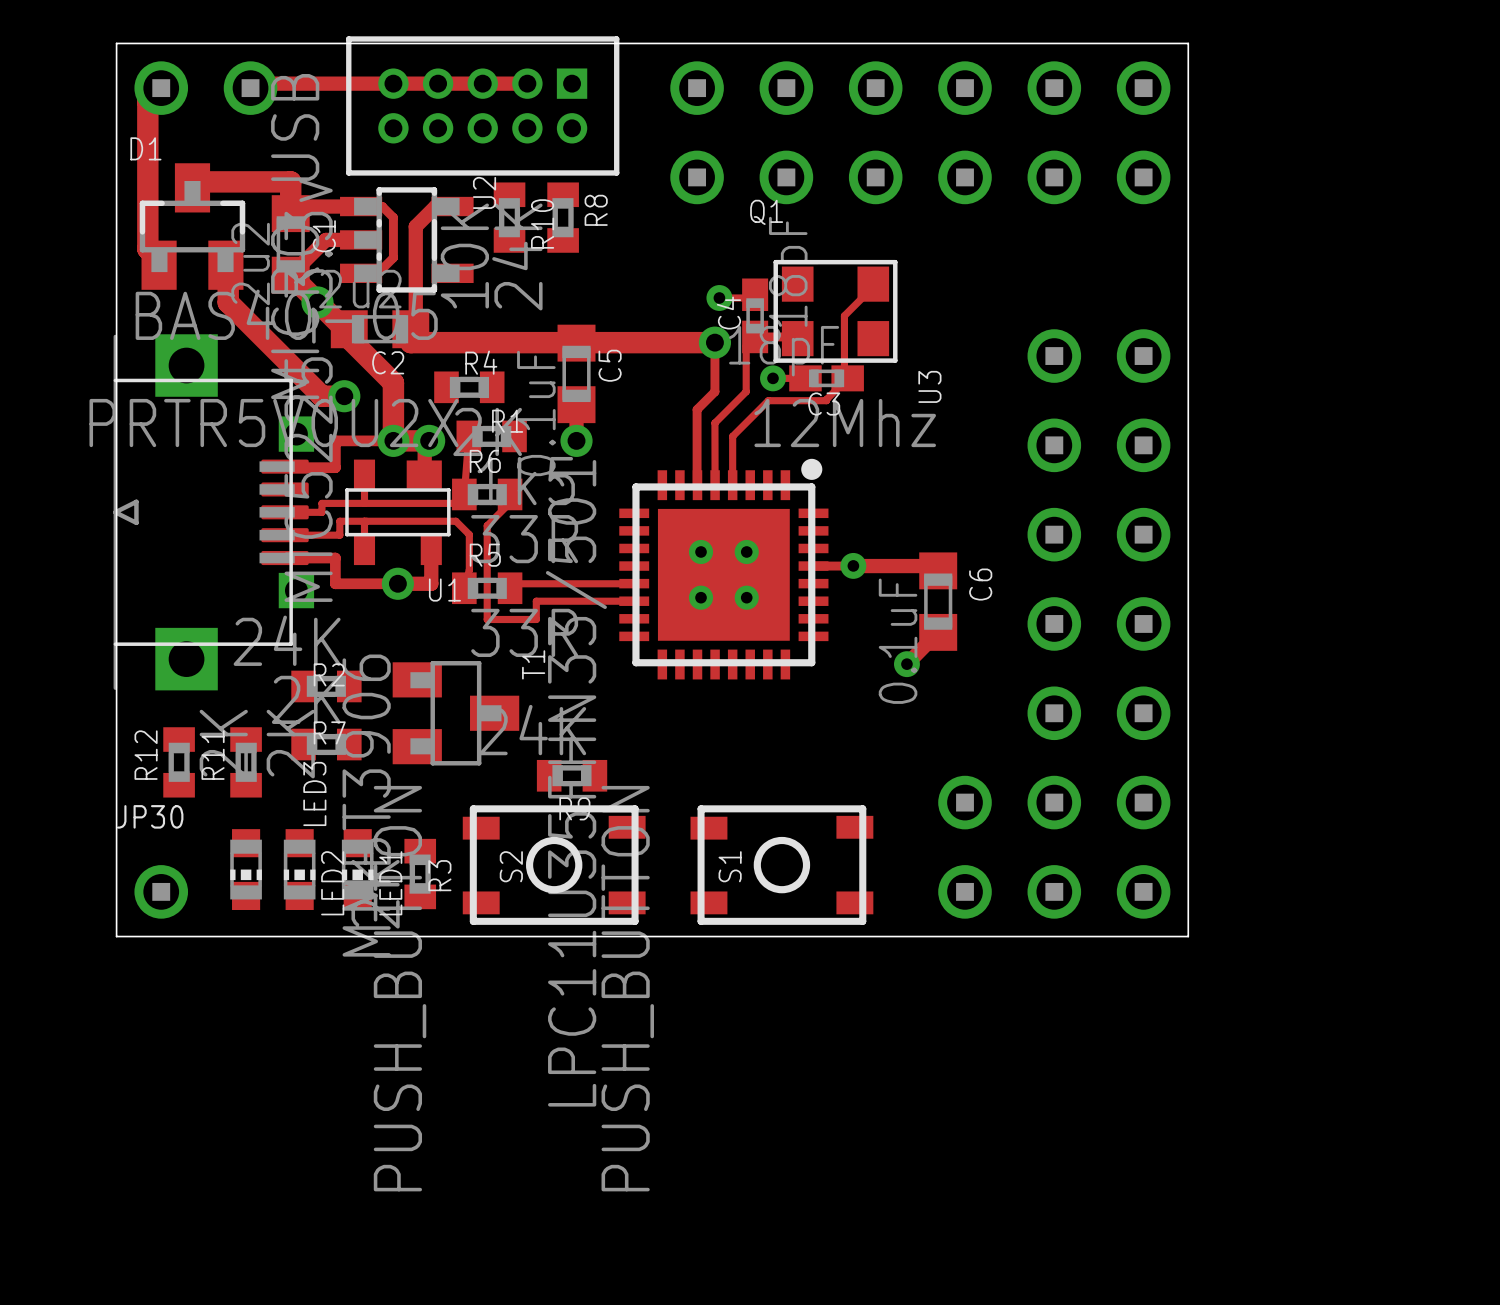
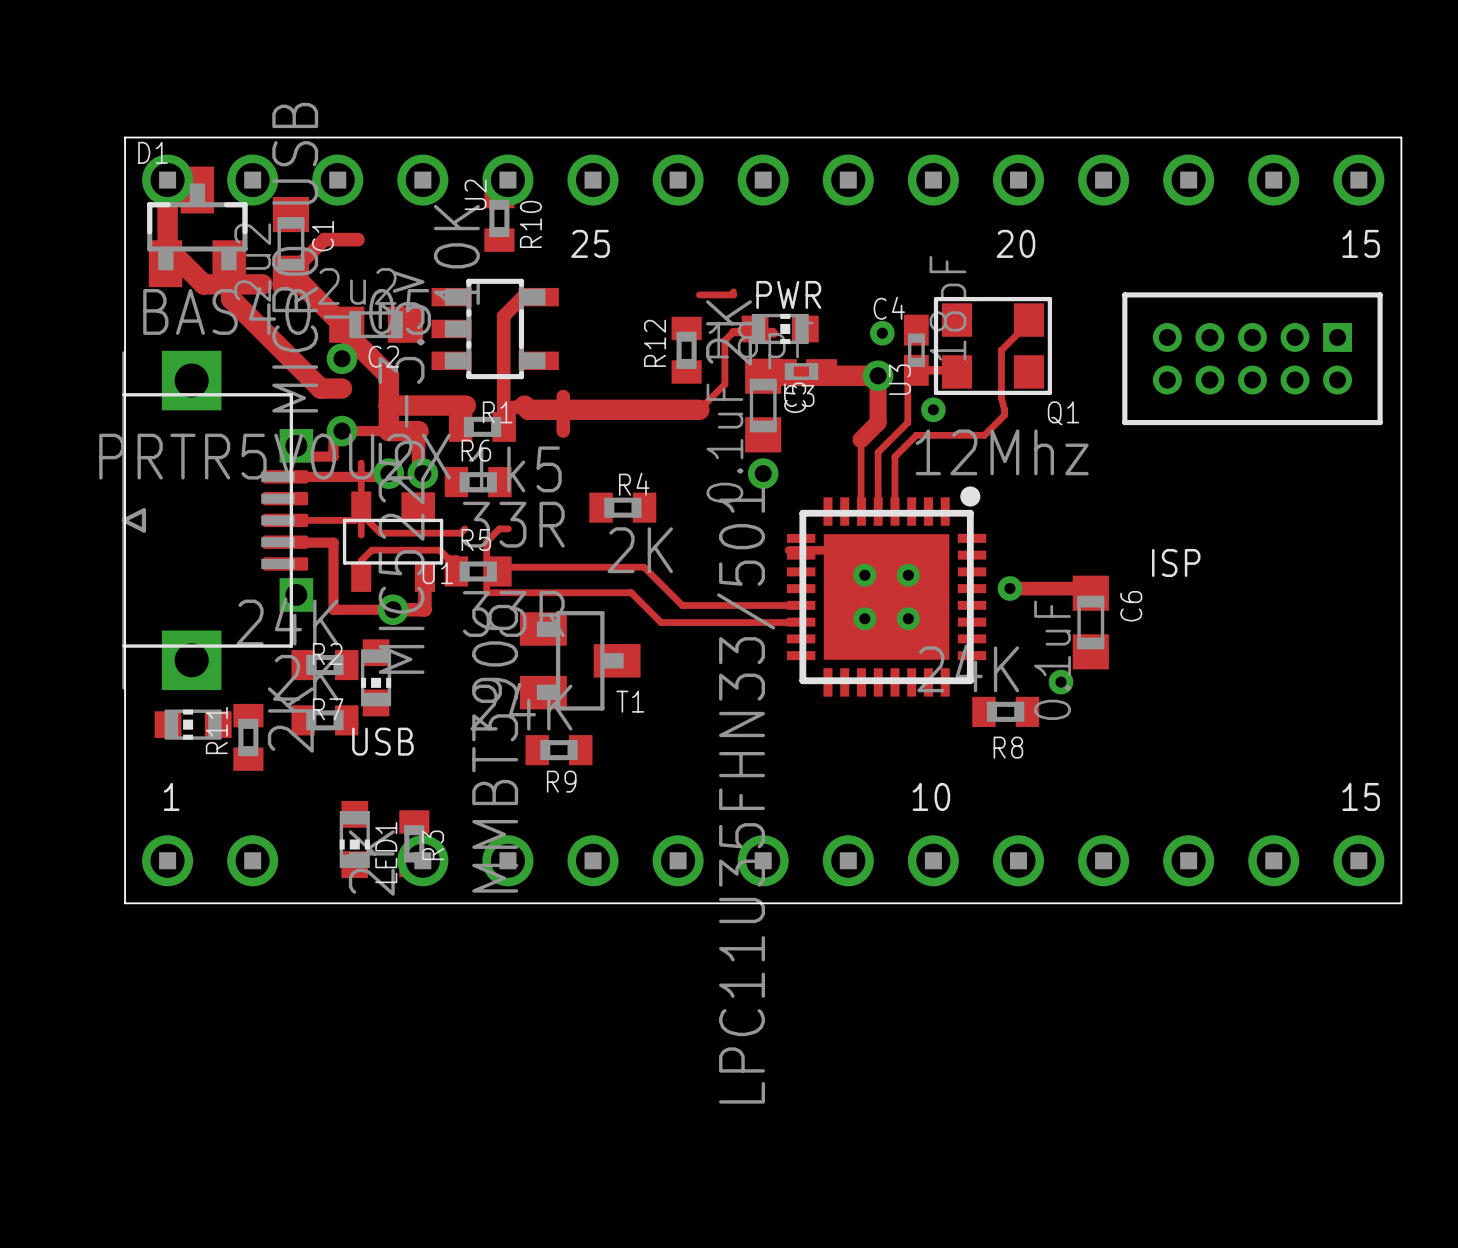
track: (527, 83) (255, 83) (250, 88) -> none
track: (161, 88) (147, 101) (147, 248) (159, 260) (159, 265) -> none
part: (161, 88) -> none
part: (250, 88) -> none
part: (697, 88) -> none
part: (786, 88) -> none
part: (875, 88) -> none
part: (965, 88) -> none
part: (1054, 88) -> none
part: (1143, 88) -> none
part position: (482, 105) -> (1252, 358)
board edge: (116, 132) (116, 43) (1188, 43) (1188, 936) -> (125, 137) (1401, 137) (1401, 903) (1146, 903)
track: none -> (167, 180) (167, 248) (203, 284) (262, 284)
part: none -> (167, 180)
part: none -> (252, 180)
part: none -> (337, 180)
part: none -> (422, 180)
part: none -> (507, 180)
part: none -> (593, 180)
part: none -> (1188, 180)
part: none -> (1273, 180)
part: none -> (1358, 180)
track: (192, 187) (198, 181) (290, 181) (290, 213) (290, 206) (361, 206) (382, 206) (393, 217) (393, 257) (377, 273) (361, 273) -> none
track: (453, 206) (435, 206) (415, 226) (415, 324) (410, 329) (410, 342) (714, 342) (714, 391) (697, 409) (697, 484) -> none
Q1 name position: Q1 (766, 212) -> Q1 (1063, 413)
R8 rotation: 0° (563, 217) -> 90° clockwise (1005, 711)
R8 position: (563, 217) -> (1005, 711)
U2 position: (406, 239) -> (495, 328)
text: none -> 25 (590, 243)
text: none -> 20 (1015, 243)
text: none -> 15 (1361, 243)
track: (879, 290) (873, 284) (873, 286) (844, 315) (844, 366) (847, 378) (826, 400) (768, 400) (732, 436) (732, 485) -> none
via: (719, 297) -> none
text: none -> PWR (788, 294)
via: (317, 302) -> none
Q1 position: (835, 311) -> (992, 345)
C4 name rotation: 0° (728, 313) -> 90° clockwise (889, 308)
C4 position: (755, 315) -> (916, 350)
track: none -> (1034, 325) (1028, 320) (1028, 322) (1001, 350) (1001, 398) (1004, 415) (984, 435) (916, 435) (894, 456) (894, 511)
part: none -> (780, 328)
via: none -> (882, 333)
via: (714, 342) -> none
part: (1054, 356) -> none
part: (1143, 356) -> none
C5 position: (576, 373) -> (763, 405)
via: (772, 378) -> none
track: none -> (956, 371) (955, 370) (916, 370) (907, 378) (907, 422) (878, 452) (878, 511)
track: none -> (763, 375) (878, 375) (878, 422) (861, 439) (861, 511)
via: none -> (878, 375)
R4 position: (469, 387) -> (622, 507)
via position: (344, 396) -> (342, 358)
track: none -> (388, 405) (465, 405)
track: (719, 418) (714, 423) (715, 485) -> (699, 409) (528, 409) (524, 405) (503, 409) (503, 316) (522, 297) (539, 297)
via: none -> (933, 409)
track: (468, 436) (464, 494) (473, 503) (321, 503) (321, 512) (285, 512) -> none
via: none -> (342, 431)
via: (393, 440) -> none
via: (429, 440) -> none
via: (576, 440) -> none
part: (1054, 445) -> none
part: (1143, 445) -> none
track: none -> (388, 473) (385, 476) (285, 476)
via: none -> (388, 473)
via: none -> (422, 473)
via: none -> (763, 473)
track: (514, 502) (510, 494) (510, 502) (487, 525) (487, 619) (536, 619) (536, 601) (634, 601) -> none
part position: (213, 512) -> (217, 520)
U1 position: (397, 512) -> (393, 541)
part: (1054, 534) -> none
part: (1143, 534) -> none
track: (285, 535) (339, 535) (339, 521) (455, 521) (469, 534) (469, 569) (464, 588) -> (285, 520) (354, 520) (361, 513) (380, 533) (460, 533) (464, 528)
track: none -> (508, 528) (499, 528) (486, 541) (486, 592) (631, 592) (661, 622) (800, 622)
track: (431, 550) (431, 583) (335, 583) -> (424, 577) (424, 609) (333, 609) (333, 567)
via: (853, 565) -> none
track: (853, 566) (938, 566) (938, 570) -> (1010, 588) (1090, 588) (1090, 593)
U3 position: (723, 569) -> (886, 591)
text: none -> ISP (1176, 562)
via position: (397, 583) -> (393, 609)
track: none -> (464, 567) (456, 558) (448, 558) (439, 550) (371, 550) (361, 560) (361, 577)
track: none -> (618, 567) (644, 567) (682, 605) (801, 605)
C6 position: (938, 601) -> (1090, 622)
via: none -> (1009, 588)
part: (1054, 623) -> none
part: (1143, 623) -> none
T1 name rotation: 0° (533, 664) -> 90° clockwise (630, 701)
T1 name position: T1 (533, 664) -> T1 (630, 701)
via: (906, 664) -> none
part: none -> (376, 677)
via: none -> (1061, 682)
T1 position: (455, 713) -> (580, 660)
part: (1054, 713) -> none
part: (1143, 713) -> none
part: none -> (193, 724)
R12 position: (179, 762) -> (686, 350)
text: none -> USB (382, 741)
part: (965, 802) -> none
part: (1054, 802) -> none
part: (1143, 802) -> none
JP30 name: JP30 (150, 816) -> none
text: none -> 1 (171, 796)
text: none -> 10 (931, 796)
text: none -> 15 (1361, 796)
S2: PUSH_BUTTON (554, 865) -> none
S1: PUSH_BUTTON (781, 865) -> none
LED3: (246, 869) -> none
LED2: (299, 869) -> none
part: none -> (252, 860)
part: none -> (422, 860)
part: none -> (507, 860)
part: none -> (593, 860)
part: none -> (678, 860)
part: none -> (763, 860)
part: none -> (848, 860)
part: none -> (1188, 860)
part: none -> (1273, 860)
part: none -> (1358, 860)

